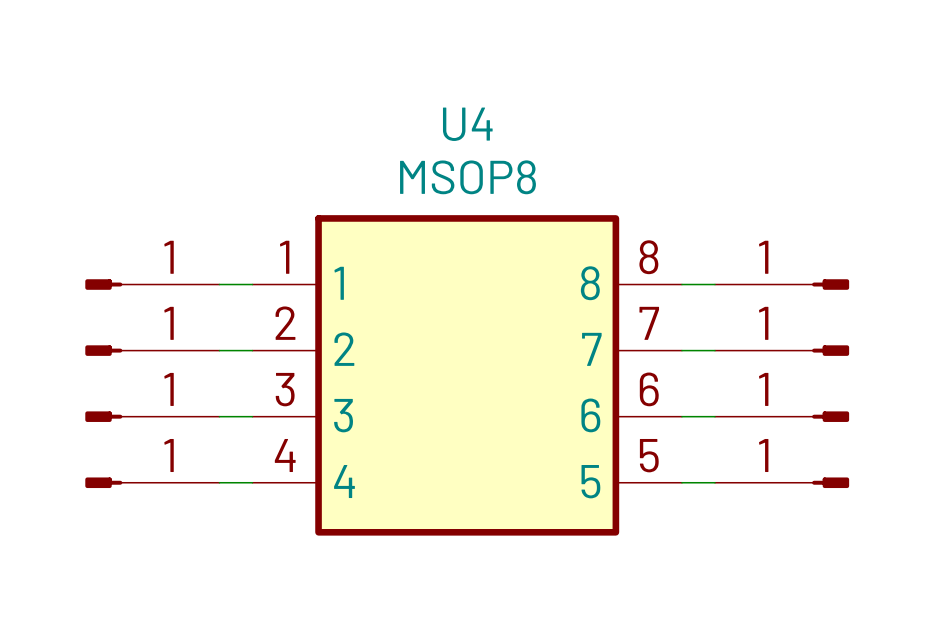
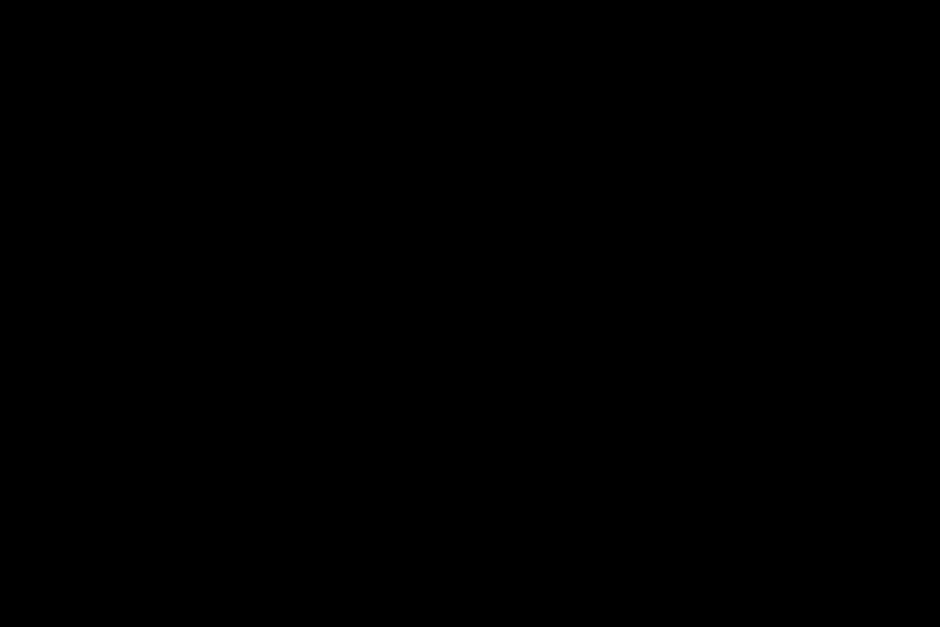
part: (152, 284) -> none
wire: (219, 284) (252, 284) -> none
wire: (681, 284) (714, 284) -> none
part: (782, 284) -> none
part: (152, 350) -> none
wire: (219, 350) (252, 350) -> none
wire: (681, 350) (714, 350) -> none
part: (782, 350) -> none
U4: MSOP8 (467, 375) -> none
part: (152, 416) -> none
wire: (219, 416) (252, 416) -> none
wire: (681, 416) (714, 416) -> none
part: (782, 416) -> none
part: (152, 482) -> none
wire: (219, 482) (252, 482) -> none
wire: (681, 482) (714, 482) -> none
part: (782, 482) -> none

